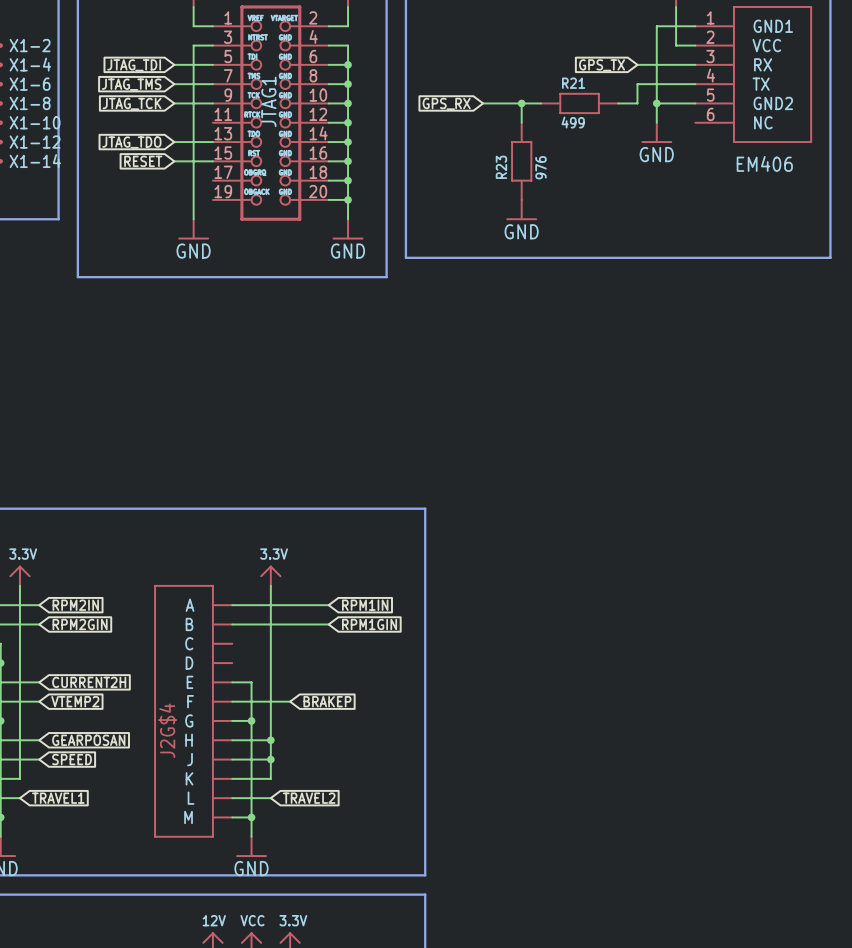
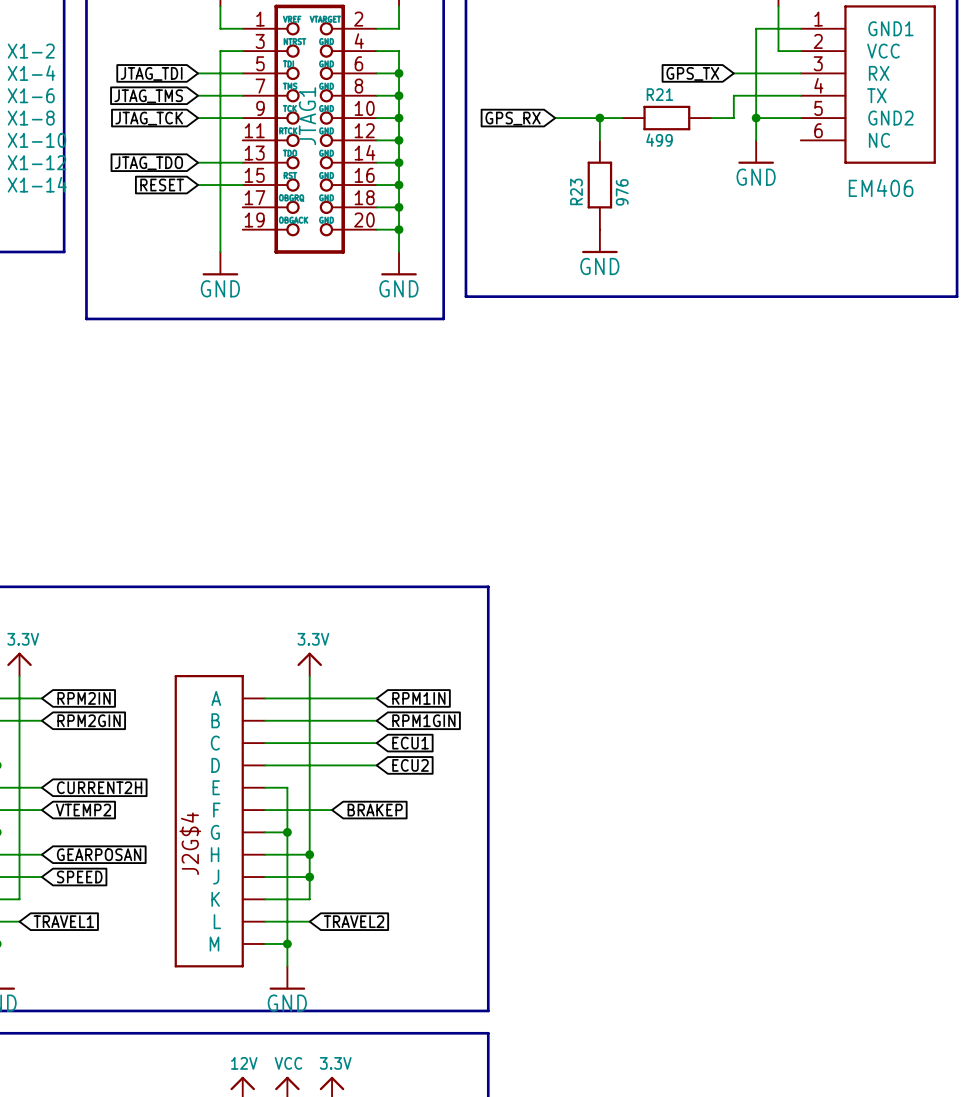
wire: none -> (265, 743) (376, 743)
global label: none -> ECU1 (410, 743)
wire: none -> (265, 765) (376, 765)
global label: none -> ECU2 (410, 765)

